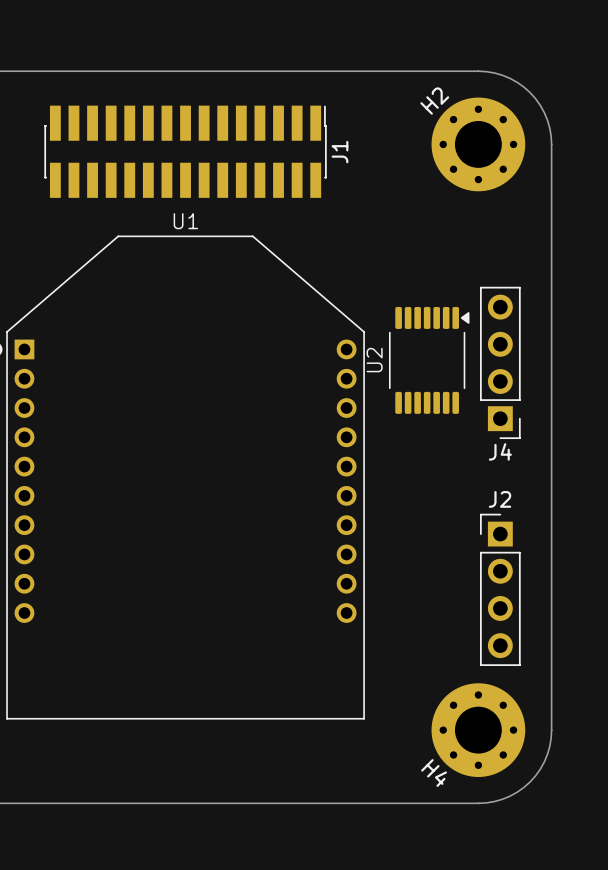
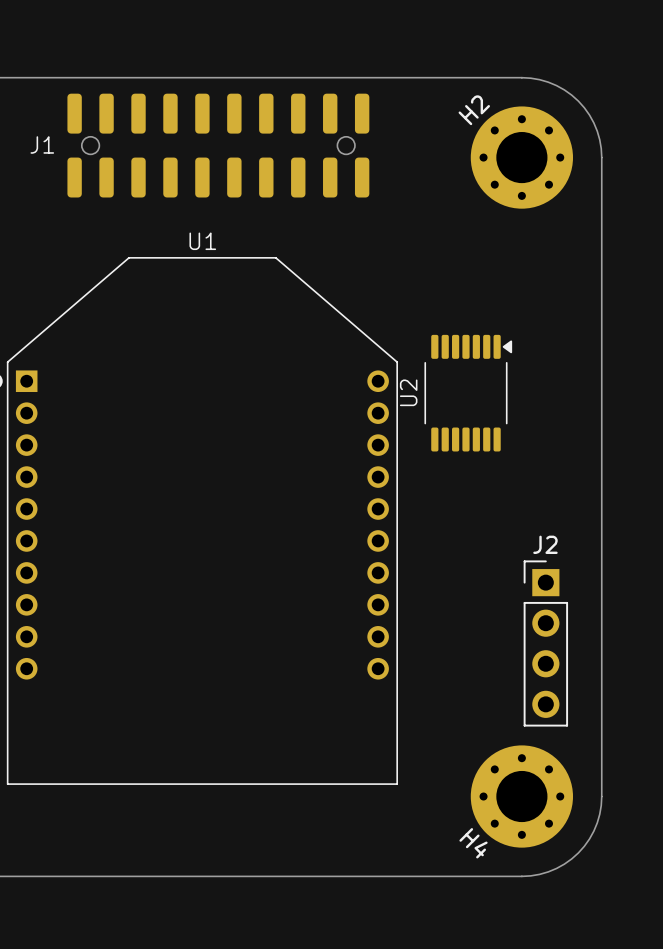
J1 footprint: [44, 105, 327, 198] -> [67, 93, 370, 198]
J1 name position: J1 (339, 152) -> J1 (42, 144)
J4: (500, 362) -> none

